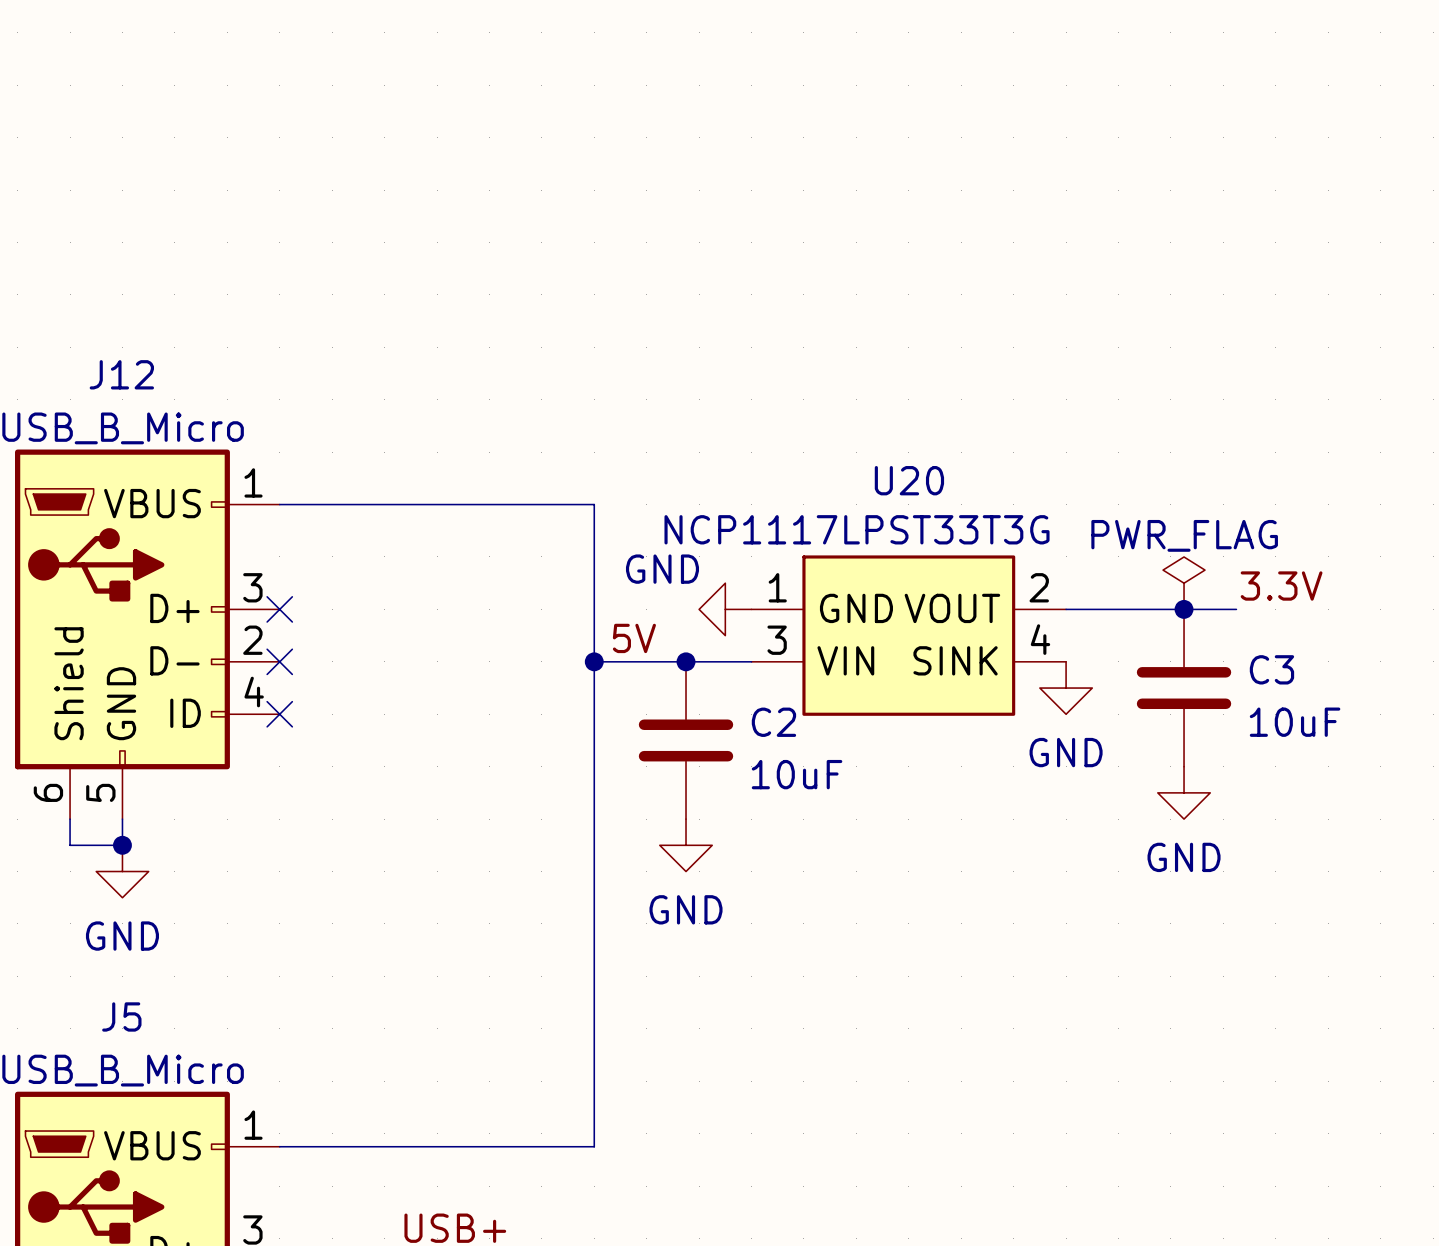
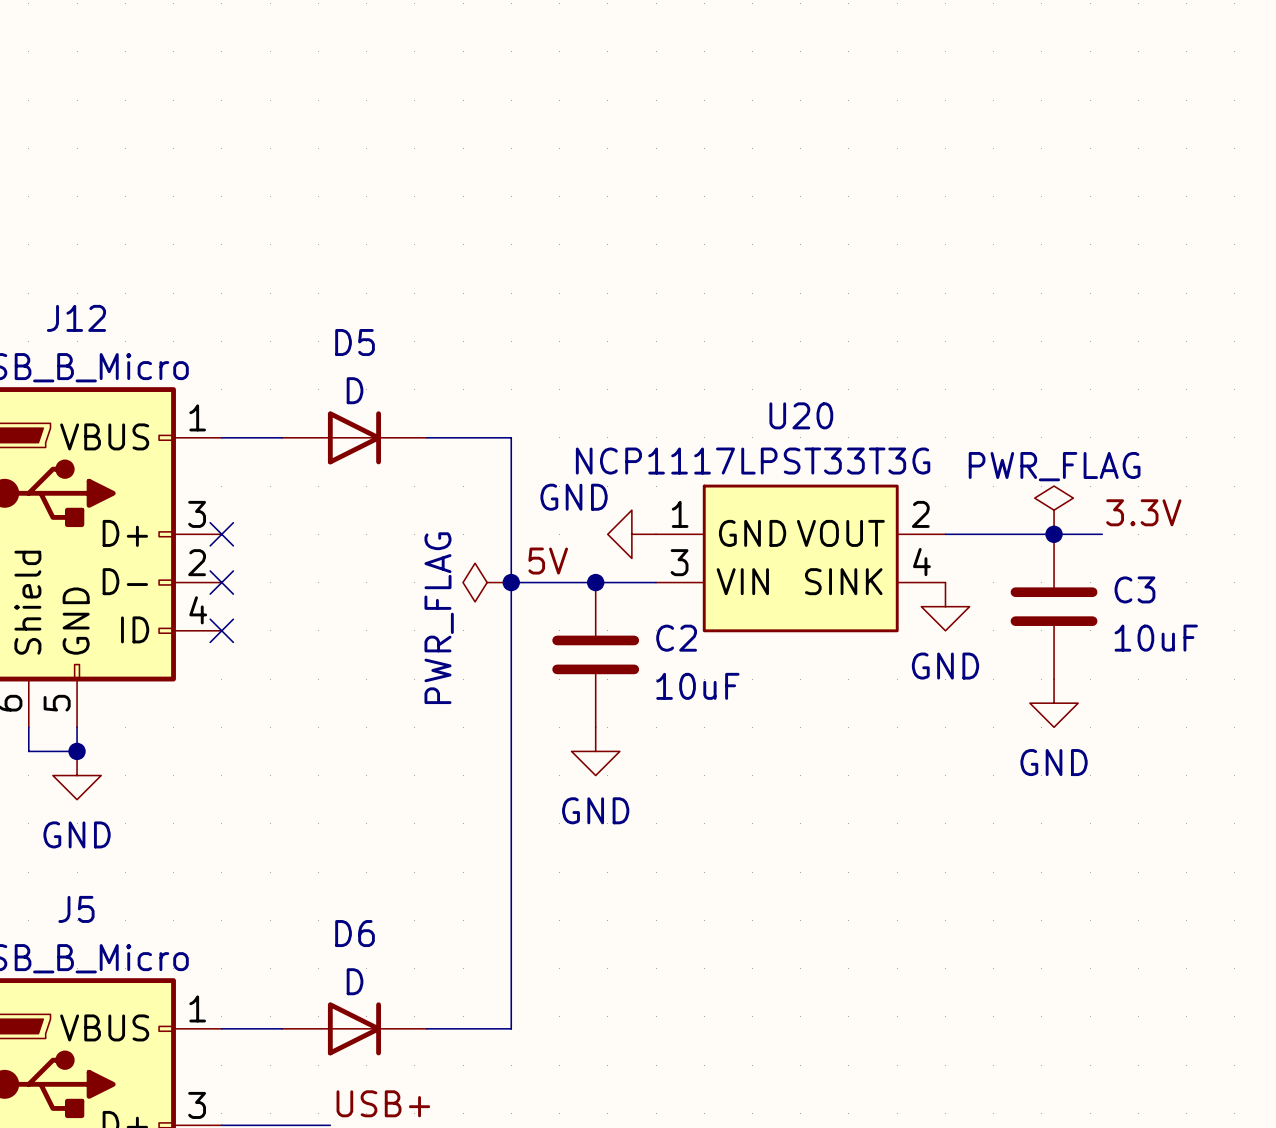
D5: none -> D (354, 437)
power symbol: none -> PWR_FLAG (487, 582)
D6: none -> D (354, 1028)

